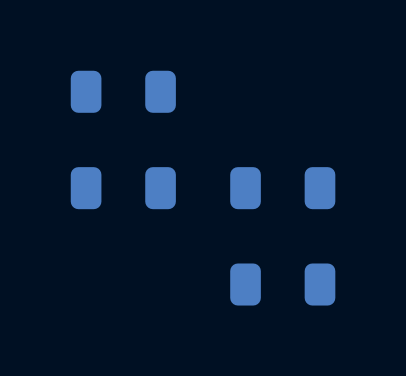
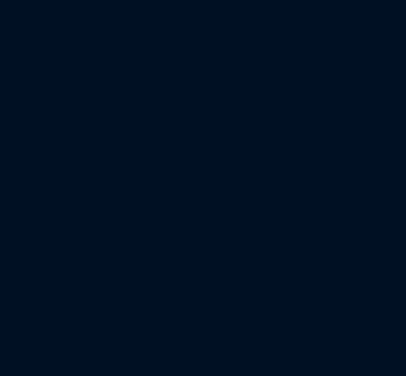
part: (123, 91) -> none
part: (123, 188) -> none
part: (282, 188) -> none
part: (282, 284) -> none

